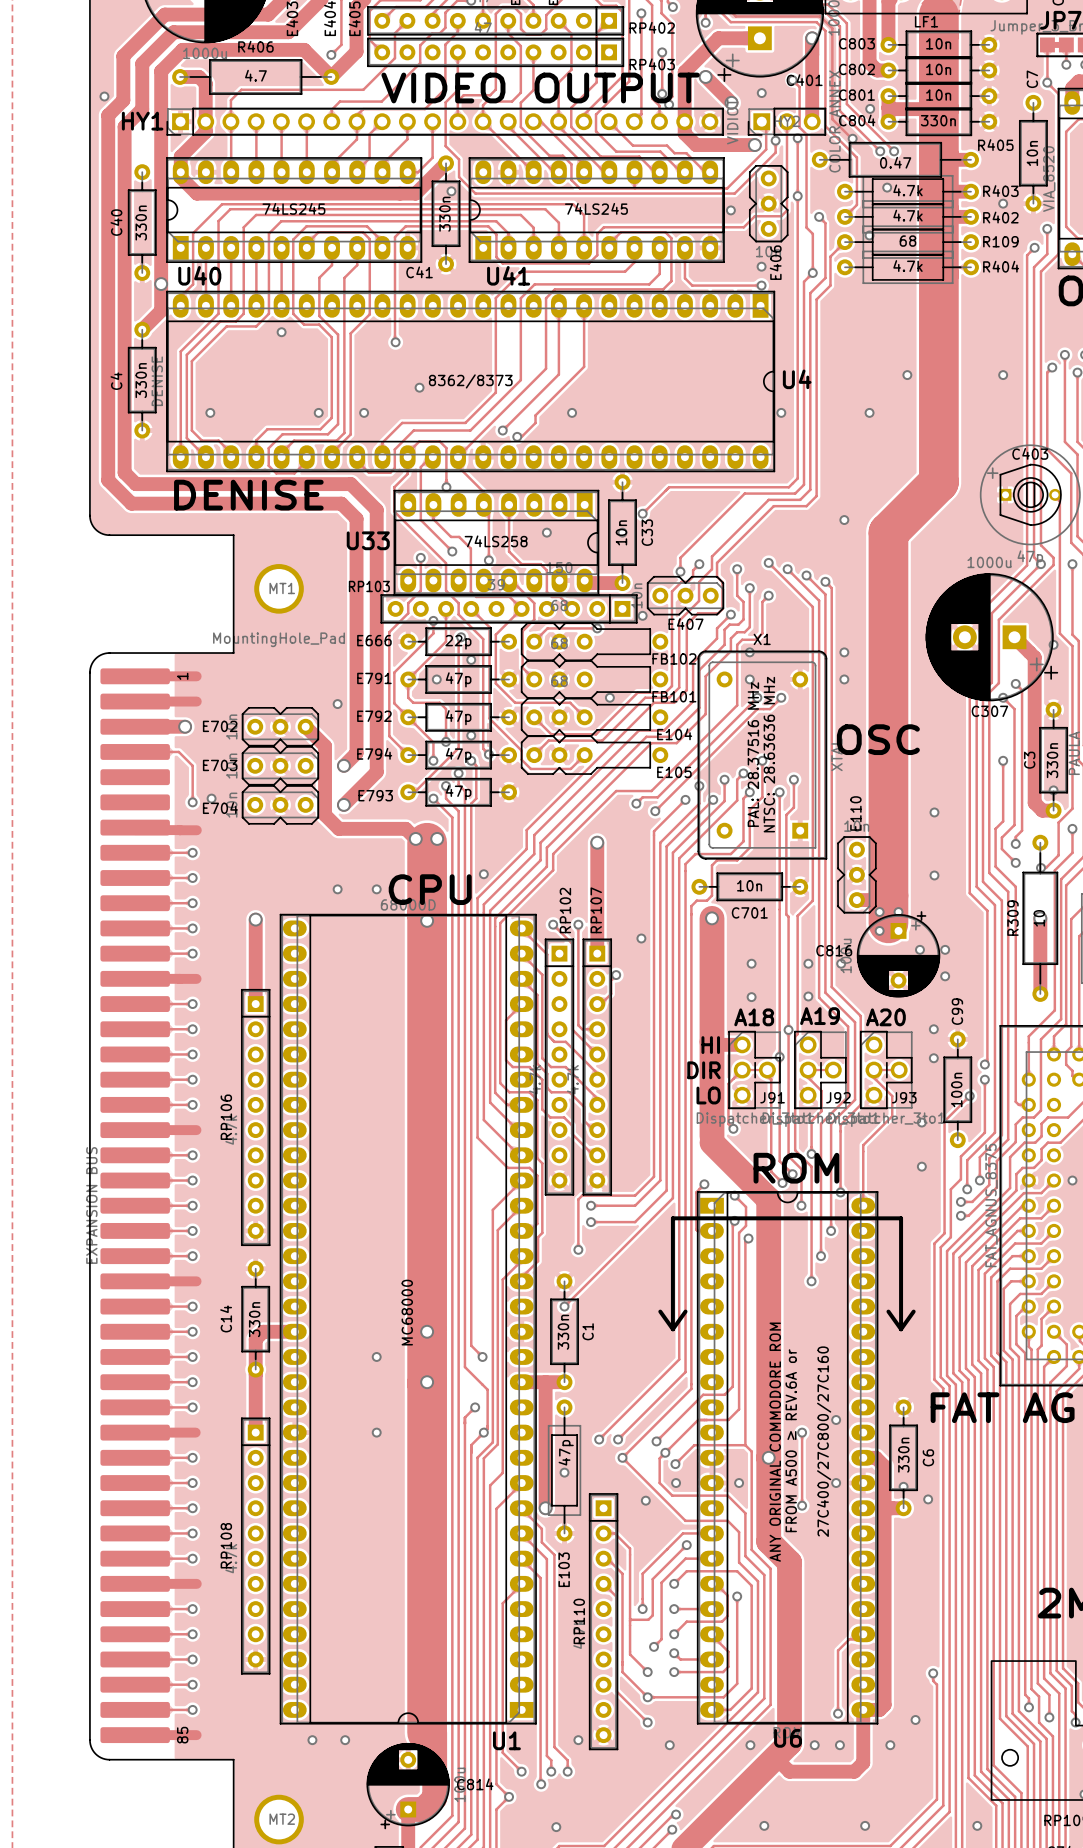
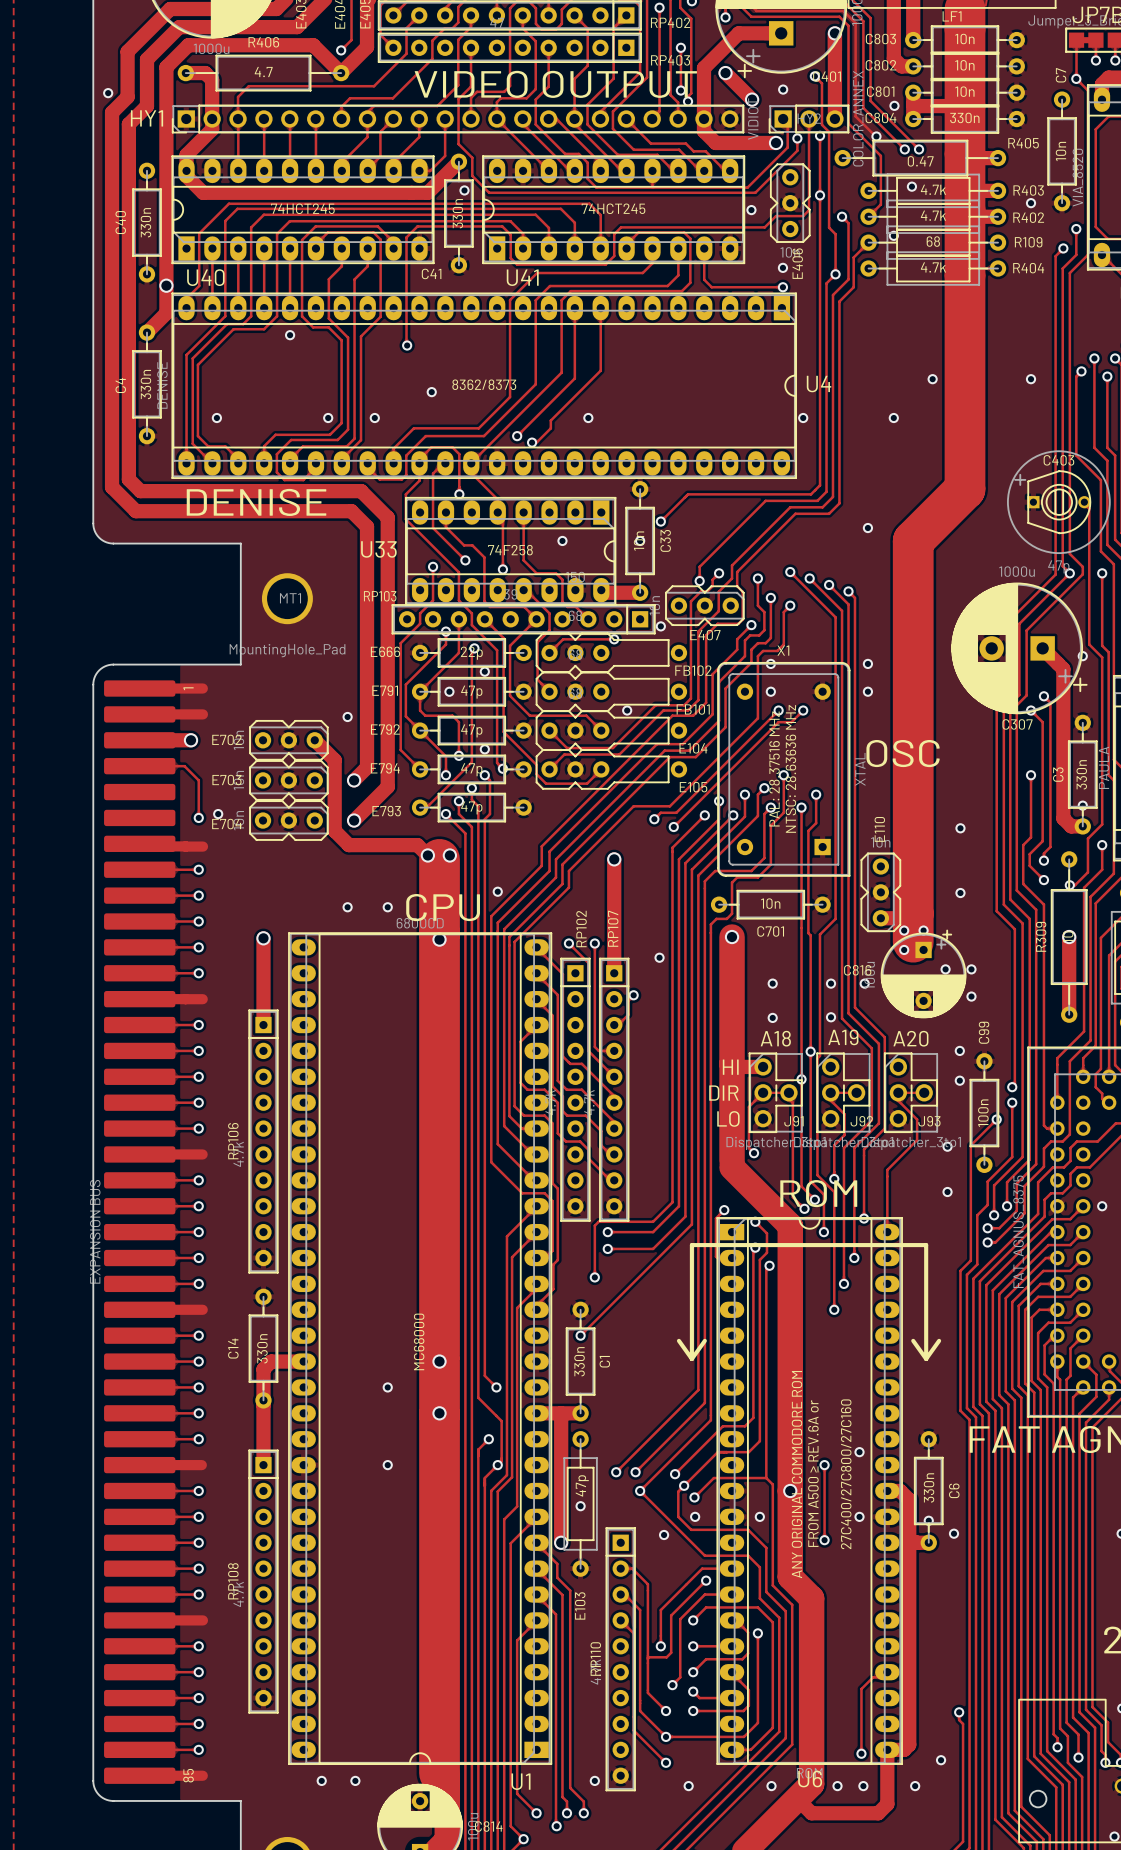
U40 value: 74LS245 (293, 208) -> 74HCT245 (302, 208)
U41 value: 74LS245 (596, 208) -> 74HCT245 (613, 208)
U33 value: 74LS258 (496, 541) -> 74F258 (510, 550)

